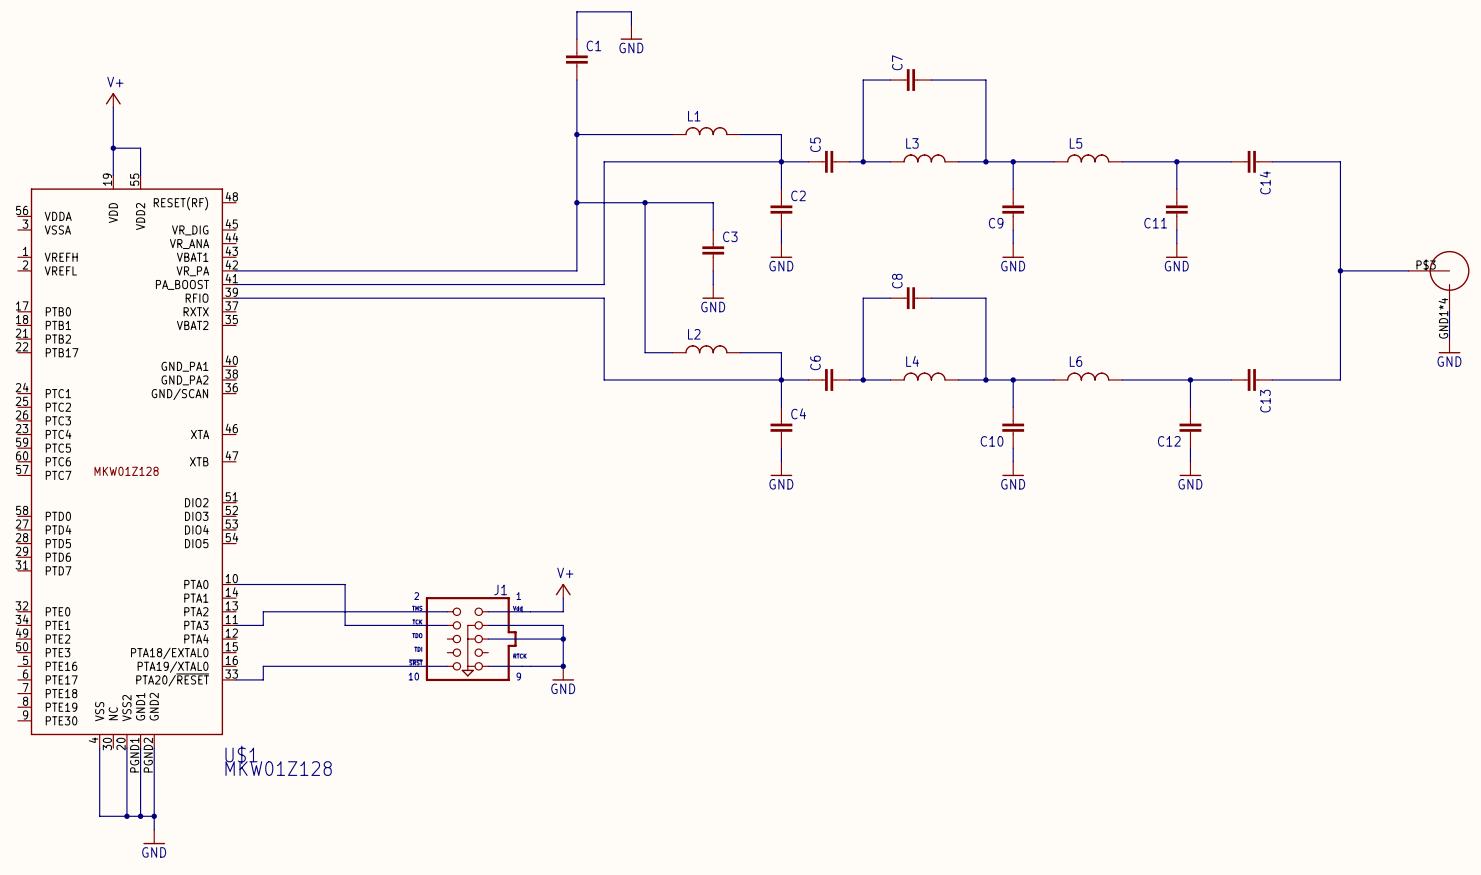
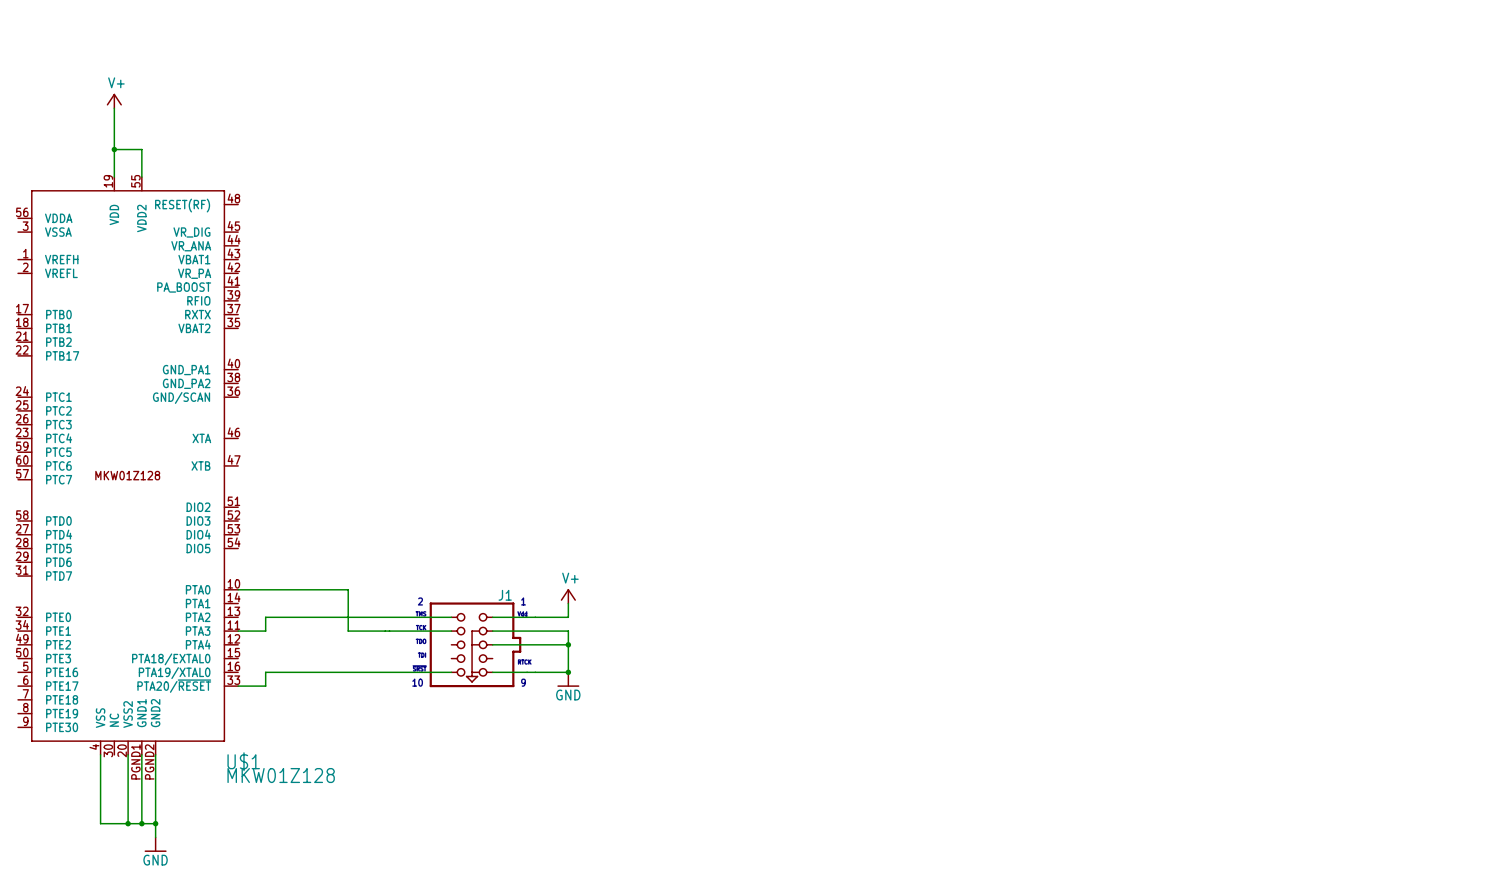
wire: (631, 25) (631, 11) (576, 11) (576, 39) -> none
power symbol: GND (631, 32) -> none
C1: (576, 59) -> none
wire: (576, 80) (576, 270) (236, 270) -> none
wire: (890, 80) (863, 80) (863, 161) -> none
C7: (910, 80) -> none
wire: (931, 80) (985, 80) (985, 161) -> none
L1: (706, 131) -> none
wire: (576, 134) (672, 134) -> none
junction: (576, 134) -> none
wire: (740, 134) (781, 134) (781, 189) -> none
L3: (924, 158) -> none
L5: (1088, 158) -> none
junction: (781, 161) -> none
wire: (808, 161) (604, 161) (604, 284) (236, 284) -> none
C5: (829, 161) -> none
wire: (849, 161) (890, 161) -> none
junction: (863, 161) -> none
wire: (958, 161) (1054, 161) -> none
junction: (985, 161) -> none
wire: (1013, 161) (1013, 189) -> none
junction: (1013, 161) -> none
wire: (1122, 161) (1231, 161) -> none
wire: (1176, 161) (1176, 189) -> none
junction: (1176, 161) -> none
C14: (1251, 161) -> none
wire: (1272, 161) (1340, 161) (1340, 379) (1272, 379) -> none
wire: (576, 202) (713, 202) (713, 230) -> none
junction: (576, 202) -> none
wire: (645, 202) (645, 352) (672, 352) -> none
junction: (645, 202) -> none
C2: (781, 209) -> none
C9: (1013, 209) -> none
C11: (1176, 209) -> none
wire: (781, 230) (781, 243) -> none
wire: (1013, 230) (1013, 243) -> none
wire: (1176, 230) (1176, 243) -> none
C3: (713, 250) -> none
power symbol: GND (781, 250) -> none
power symbol: GND (1013, 250) -> none
power symbol: GND (1176, 250) -> none
wire: (713, 270) (713, 284) -> none
wire: (1340, 270) (1408, 270) -> none
junction: (1340, 270) -> none
part: (1439, 281) -> none
power symbol: GND (713, 291) -> none
wire: (236, 298) (604, 298) (604, 379) (808, 379) -> none
wire: (890, 298) (863, 298) (863, 379) -> none
C8: (910, 298) -> none
wire: (931, 298) (985, 298) (985, 379) -> none
wire: (1449, 311) (1449, 339) -> none
power symbol: GND (1449, 346) -> none
L2: (706, 349) -> none
wire: (740, 352) (781, 352) (781, 407) -> none
L4: (924, 376) -> none
L6: (1088, 376) -> none
junction: (781, 379) -> none
C6: (829, 379) -> none
wire: (849, 379) (890, 379) -> none
junction: (863, 379) -> none
wire: (958, 379) (1054, 379) -> none
junction: (985, 379) -> none
wire: (1013, 379) (1013, 407) -> none
junction: (1013, 379) -> none
wire: (1122, 379) (1231, 379) -> none
wire: (1190, 379) (1190, 407) -> none
junction: (1190, 379) -> none
C13: (1251, 379) -> none
C4: (781, 427) -> none
C10: (1013, 427) -> none
C12: (1190, 427) -> none
wire: (781, 448) (781, 461) -> none
wire: (1013, 448) (1013, 461) -> none
wire: (1190, 448) (1190, 461) -> none
power symbol: GND (781, 468) -> none
power symbol: GND (1013, 468) -> none
power symbol: GND (1190, 468) -> none

